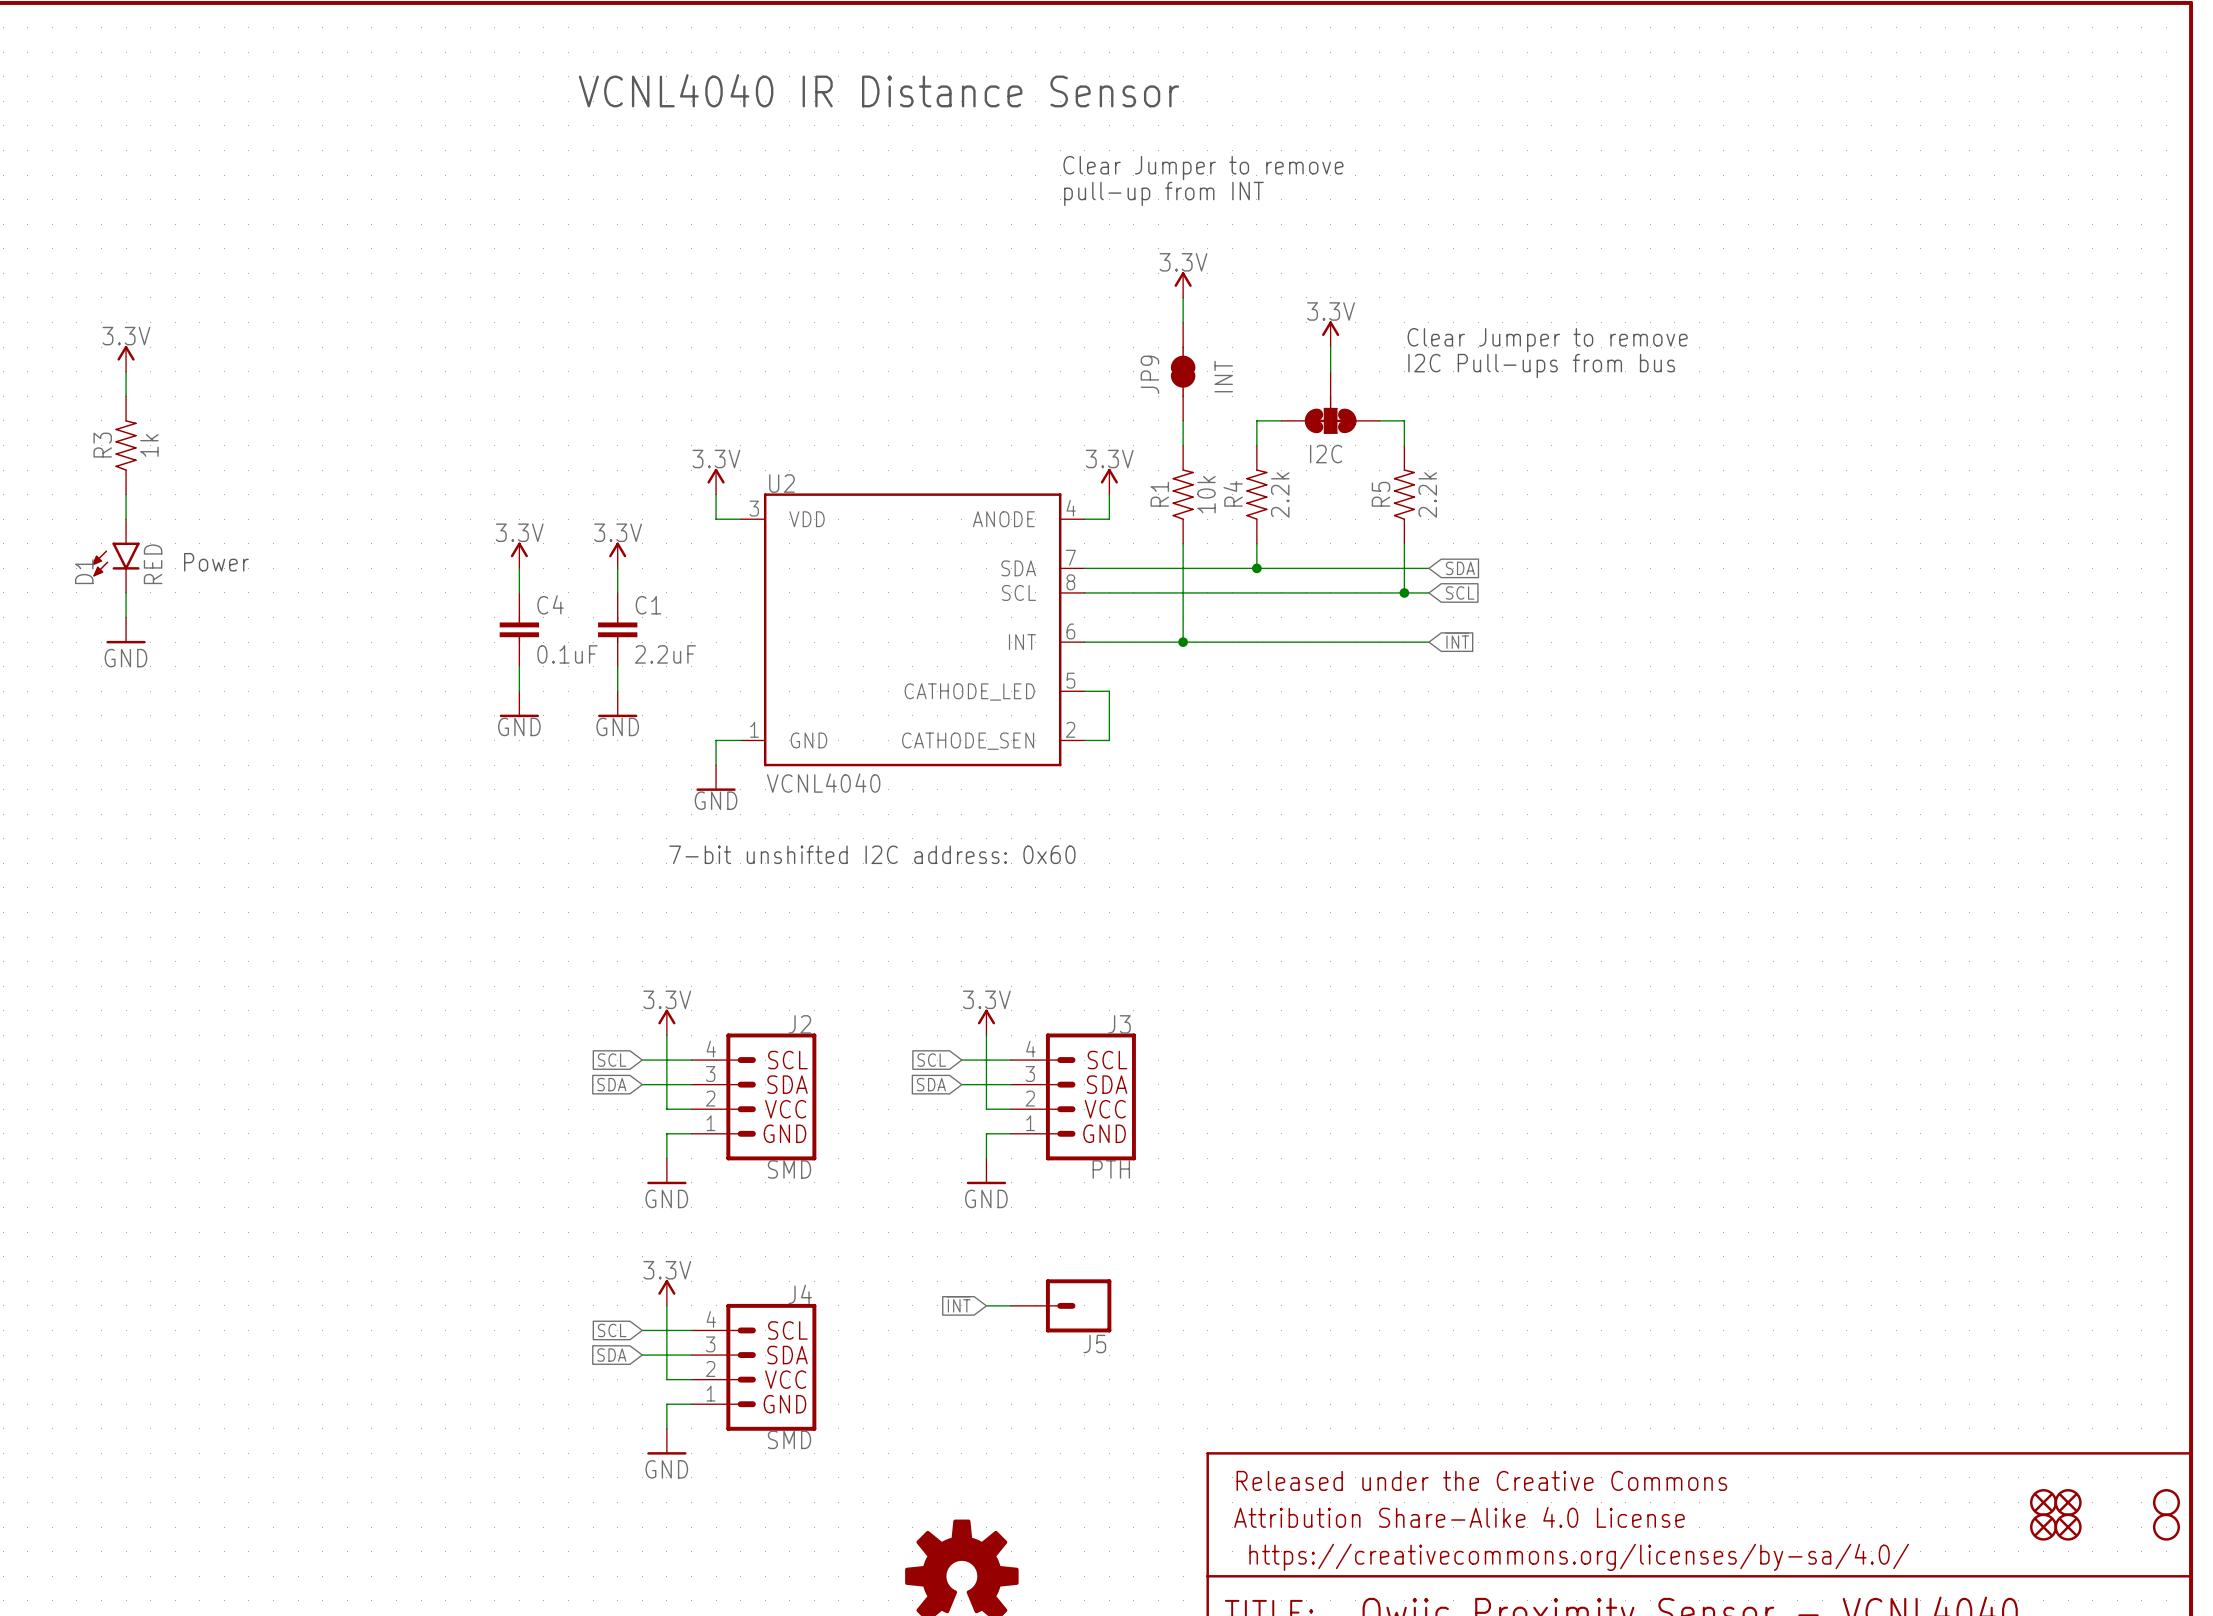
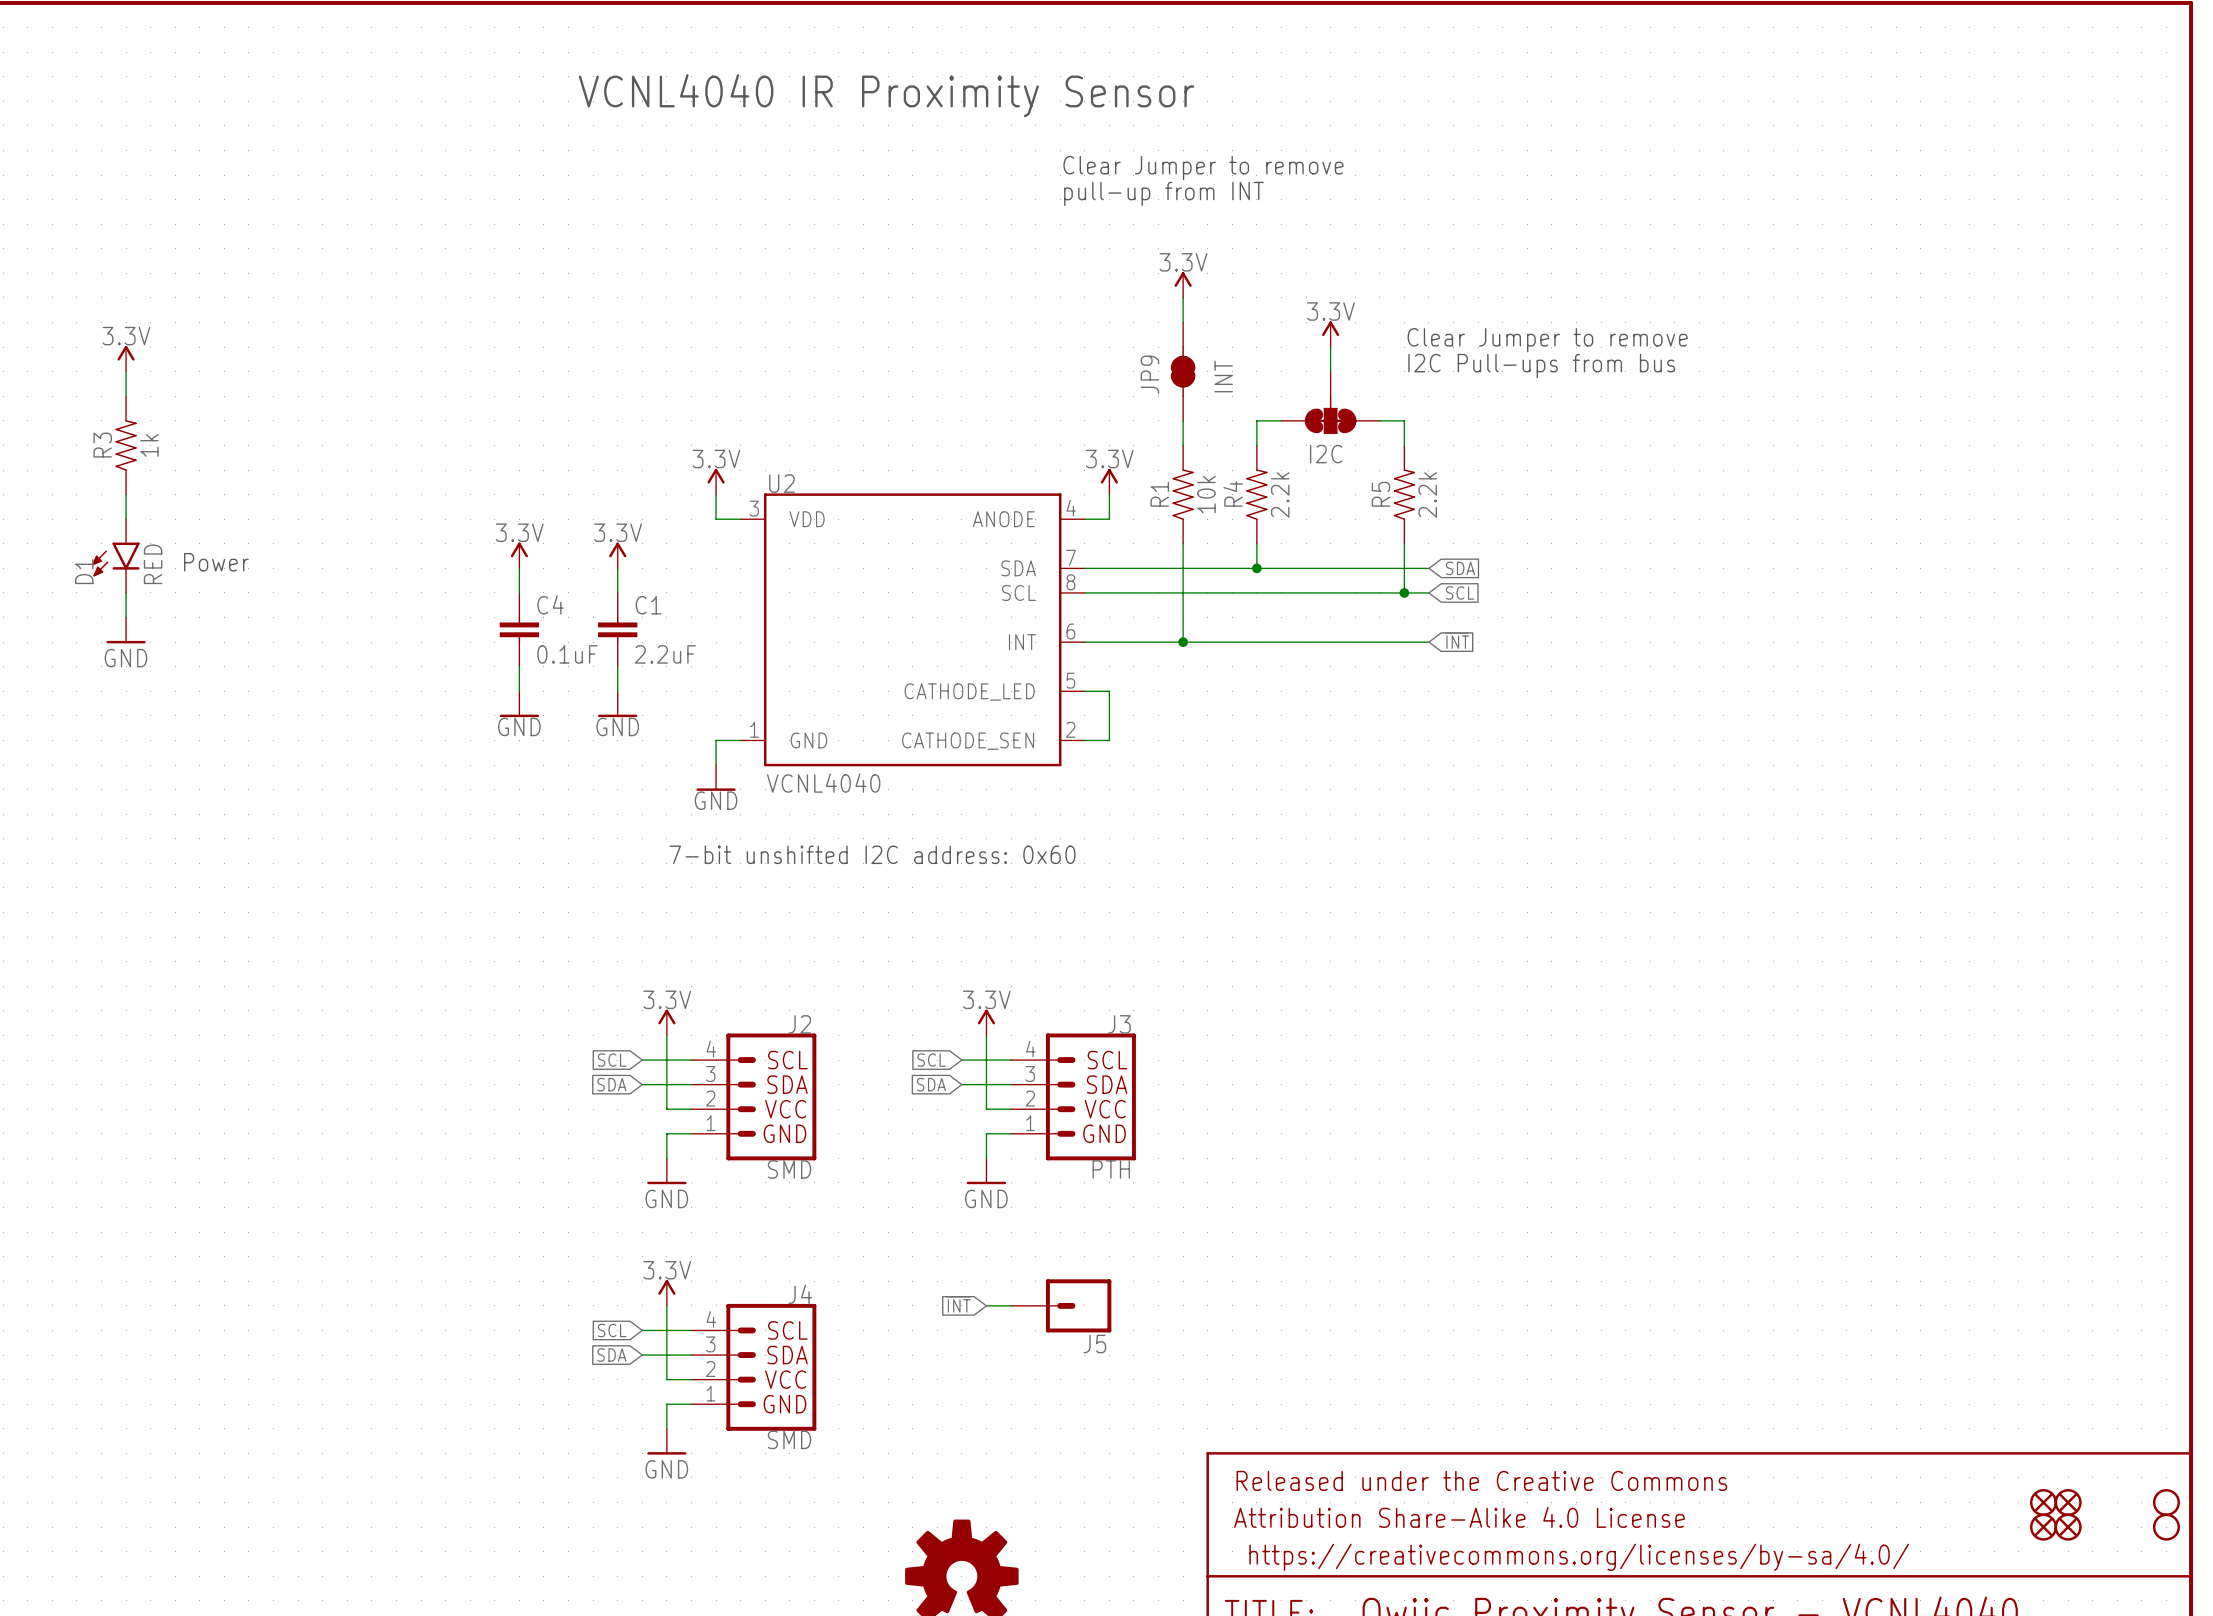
text: VCNL4040 IR Distance Sensor (879, 90) -> VCNL4040 IR Proximity Sensor (886, 95)

